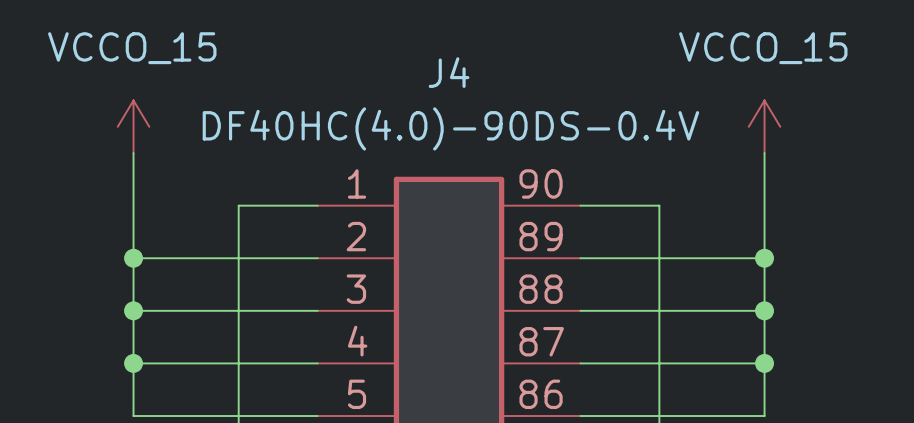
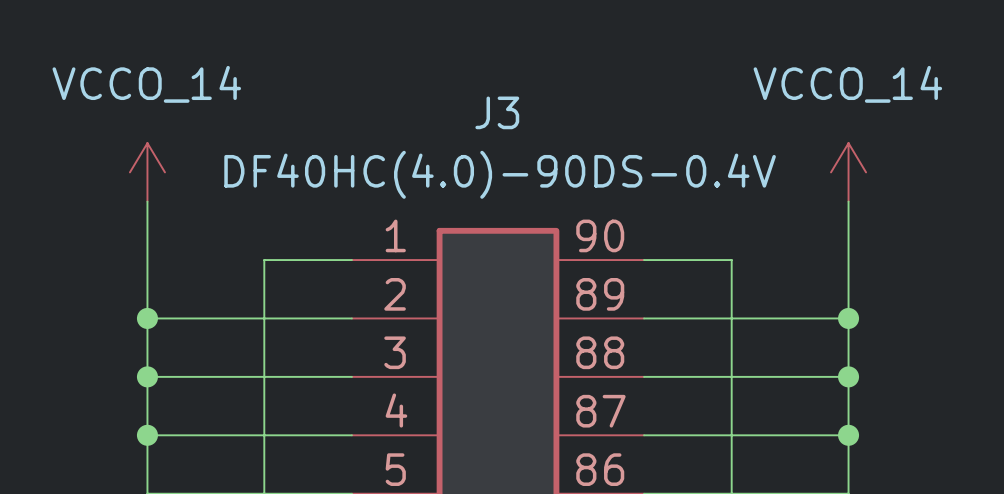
J4 name: J4 (449, 72) -> J3 (497, 112)
power symbol: VCCO_15 (133, 126) -> VCCO_14 (147, 172)
power symbol: VCCO_15 (764, 126) -> VCCO_14 (848, 172)

